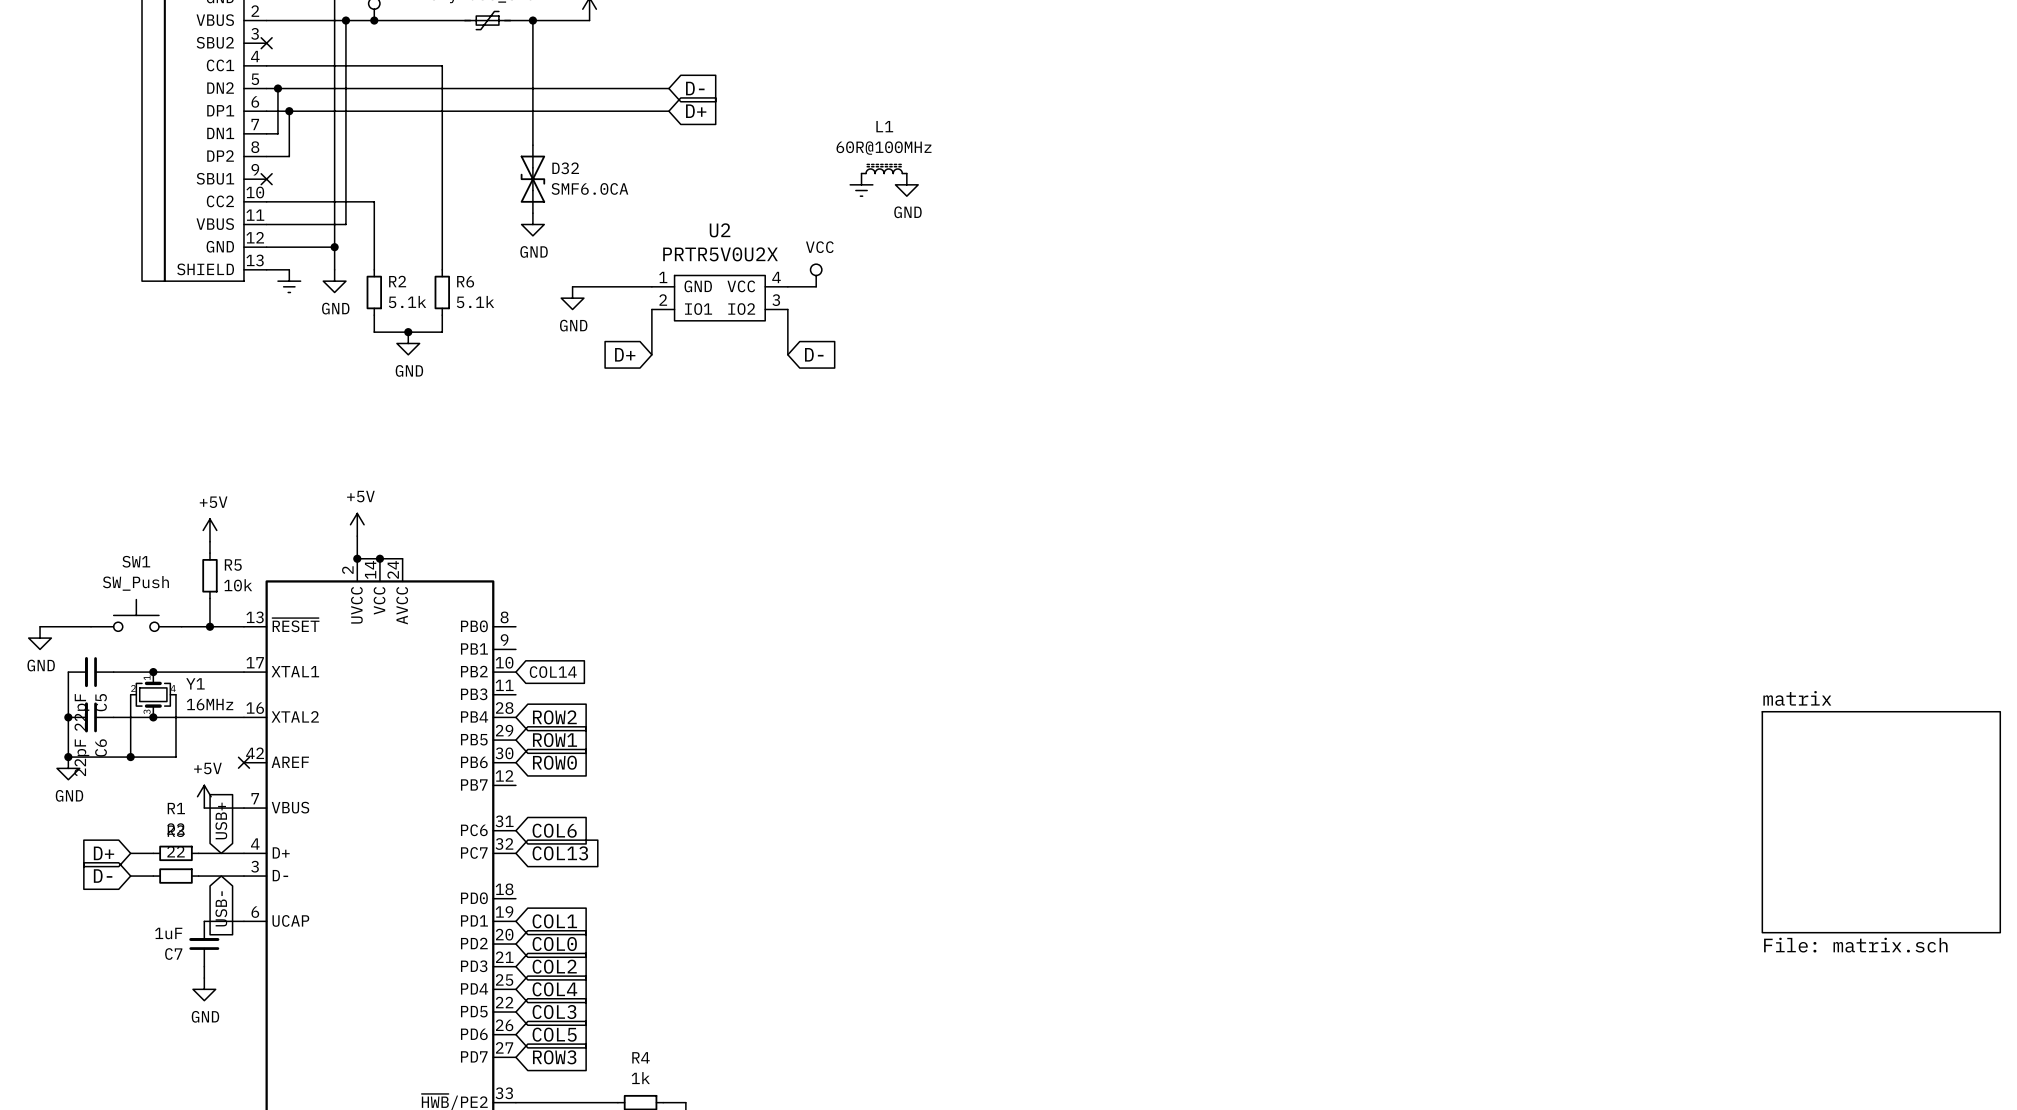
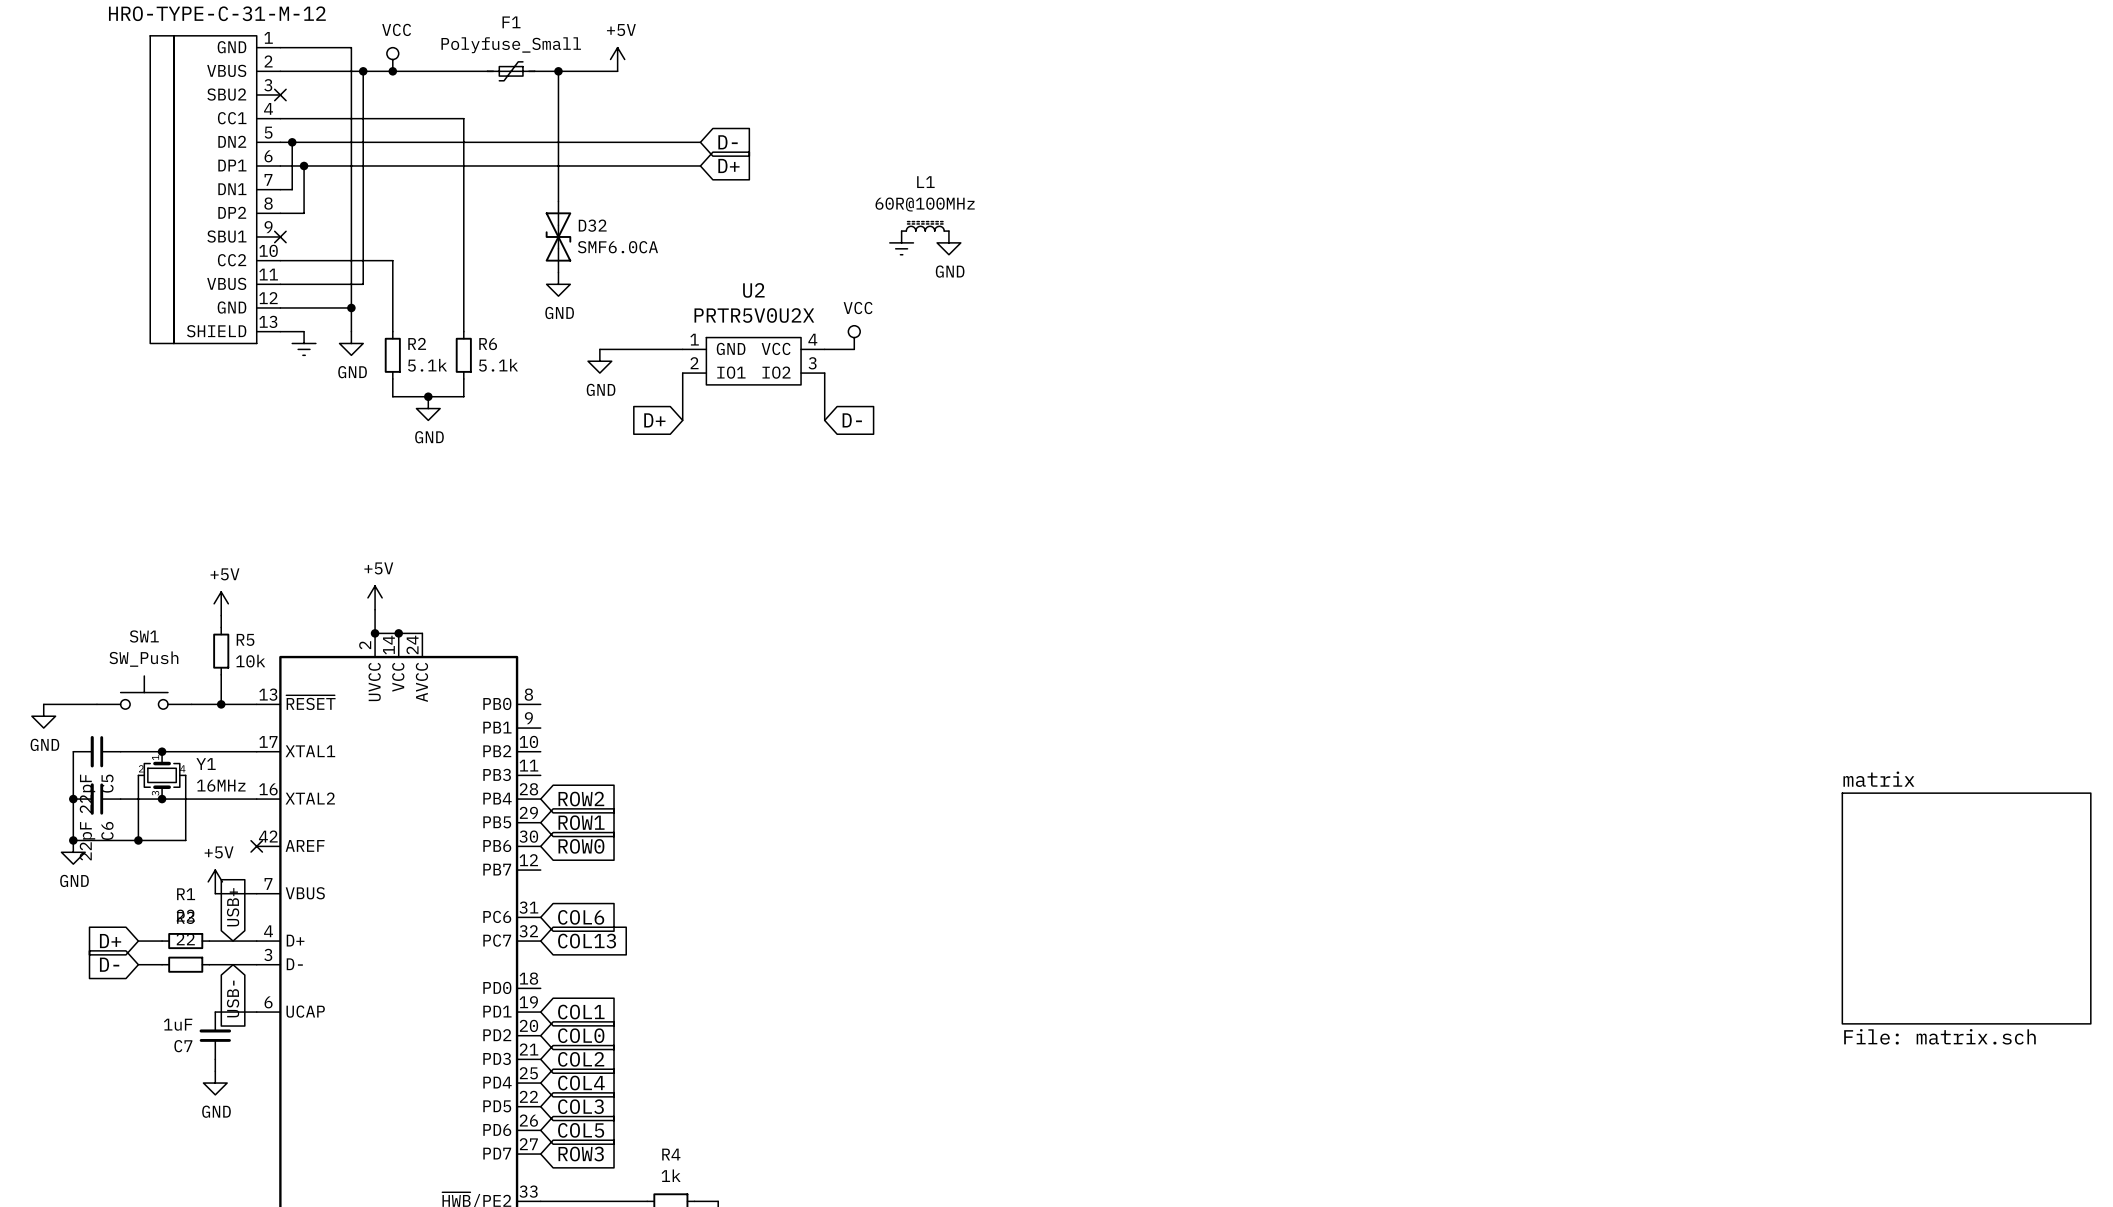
global label: COL14 (553, 672) -> none

